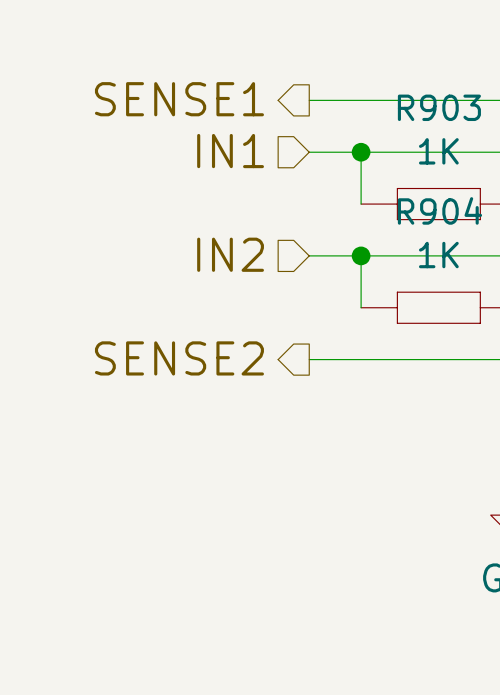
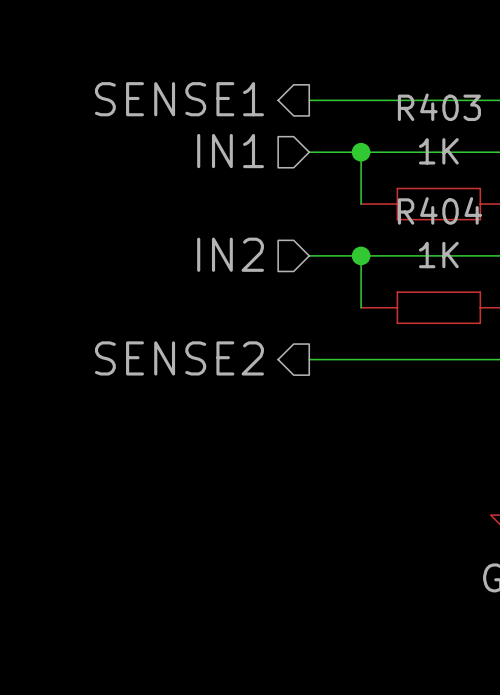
R903 name: R903 (439, 107) -> R403 (439, 107)
R904 name: R904 (439, 210) -> R404 (439, 210)

